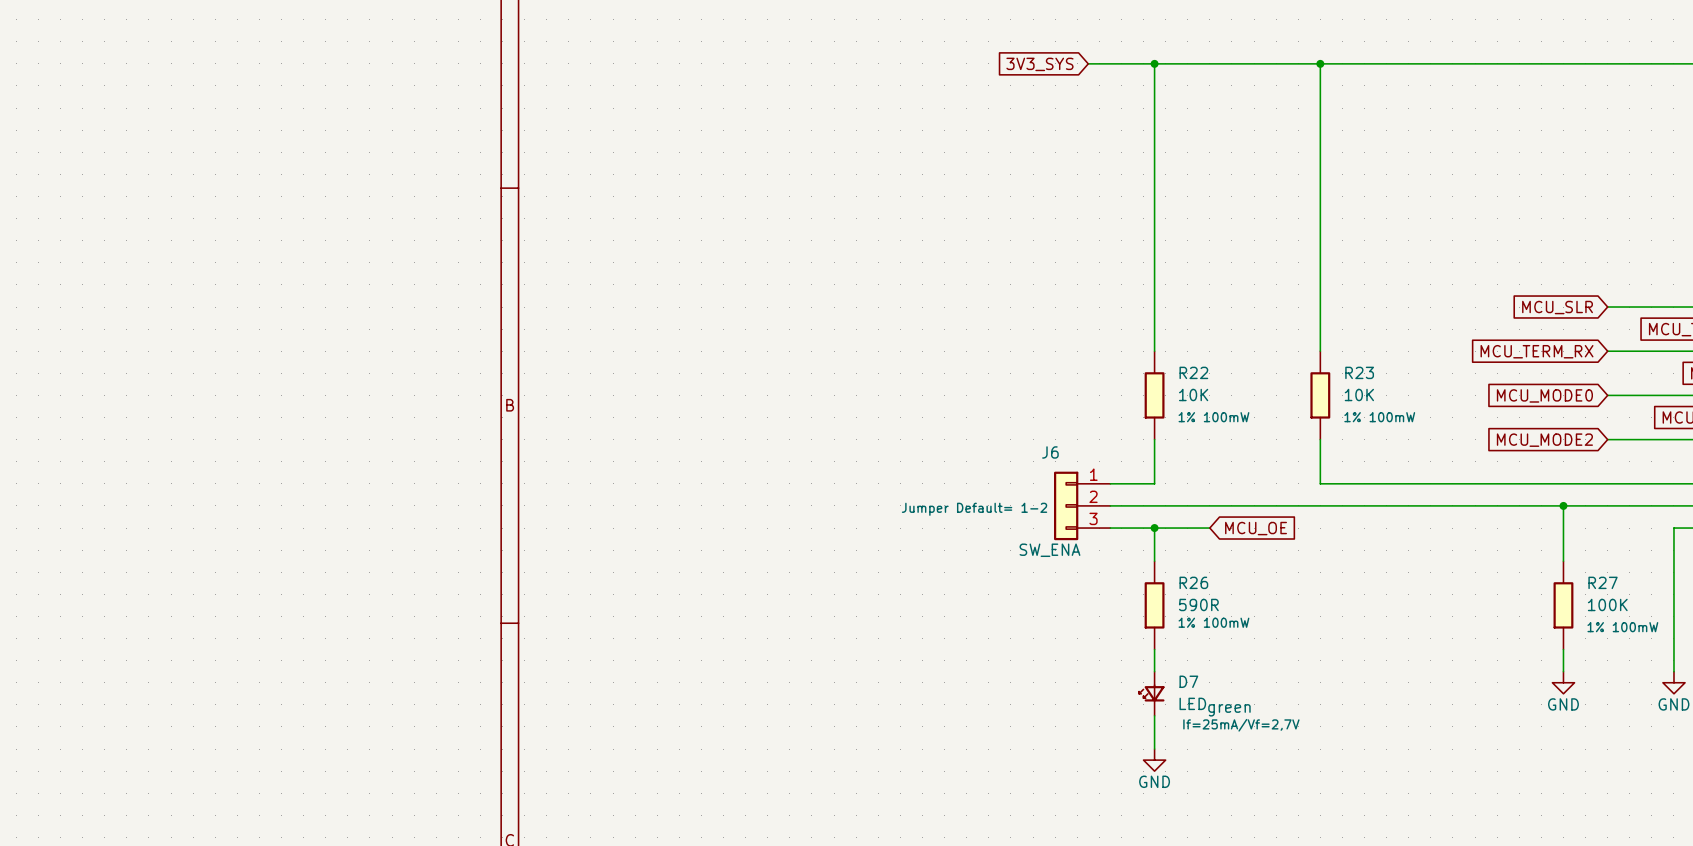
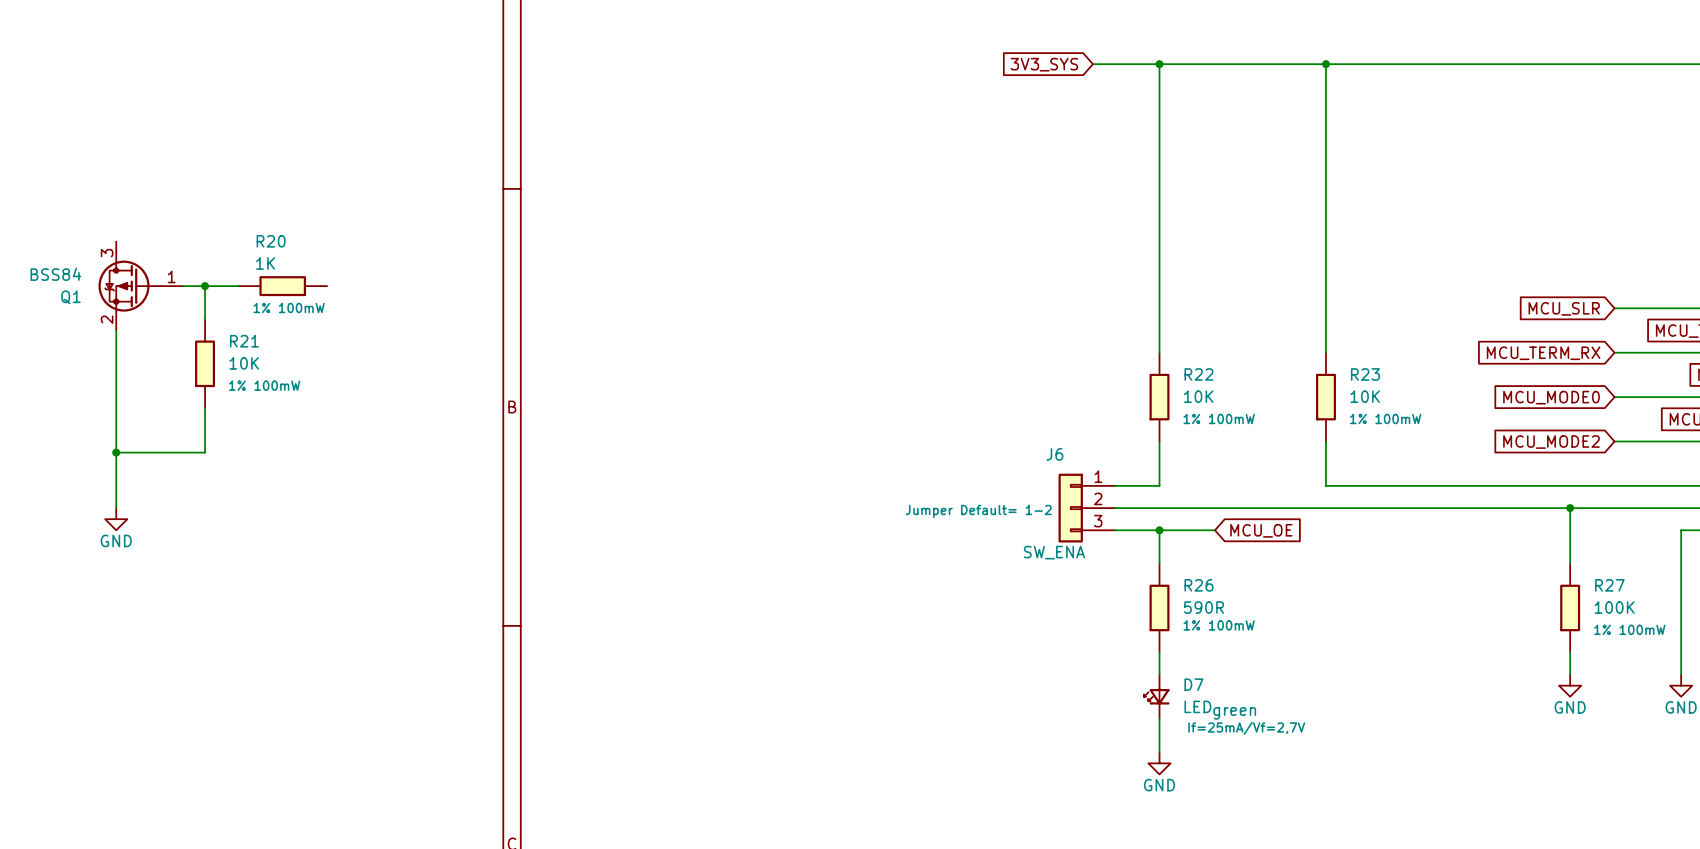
Q1: none -> BSS84 (140, 286)
wire: none -> (182, 286) (238, 286)
wire: none -> (205, 286) (205, 319)
junction: none -> (205, 286)
R20: none -> 1K (282, 286)
wire: none -> (116, 330) (116, 508)
R21: none -> 10K (205, 363)
wire: none -> (205, 408) (205, 452) (116, 452)
junction: none -> (116, 452)
power symbol: none -> GND (116, 519)

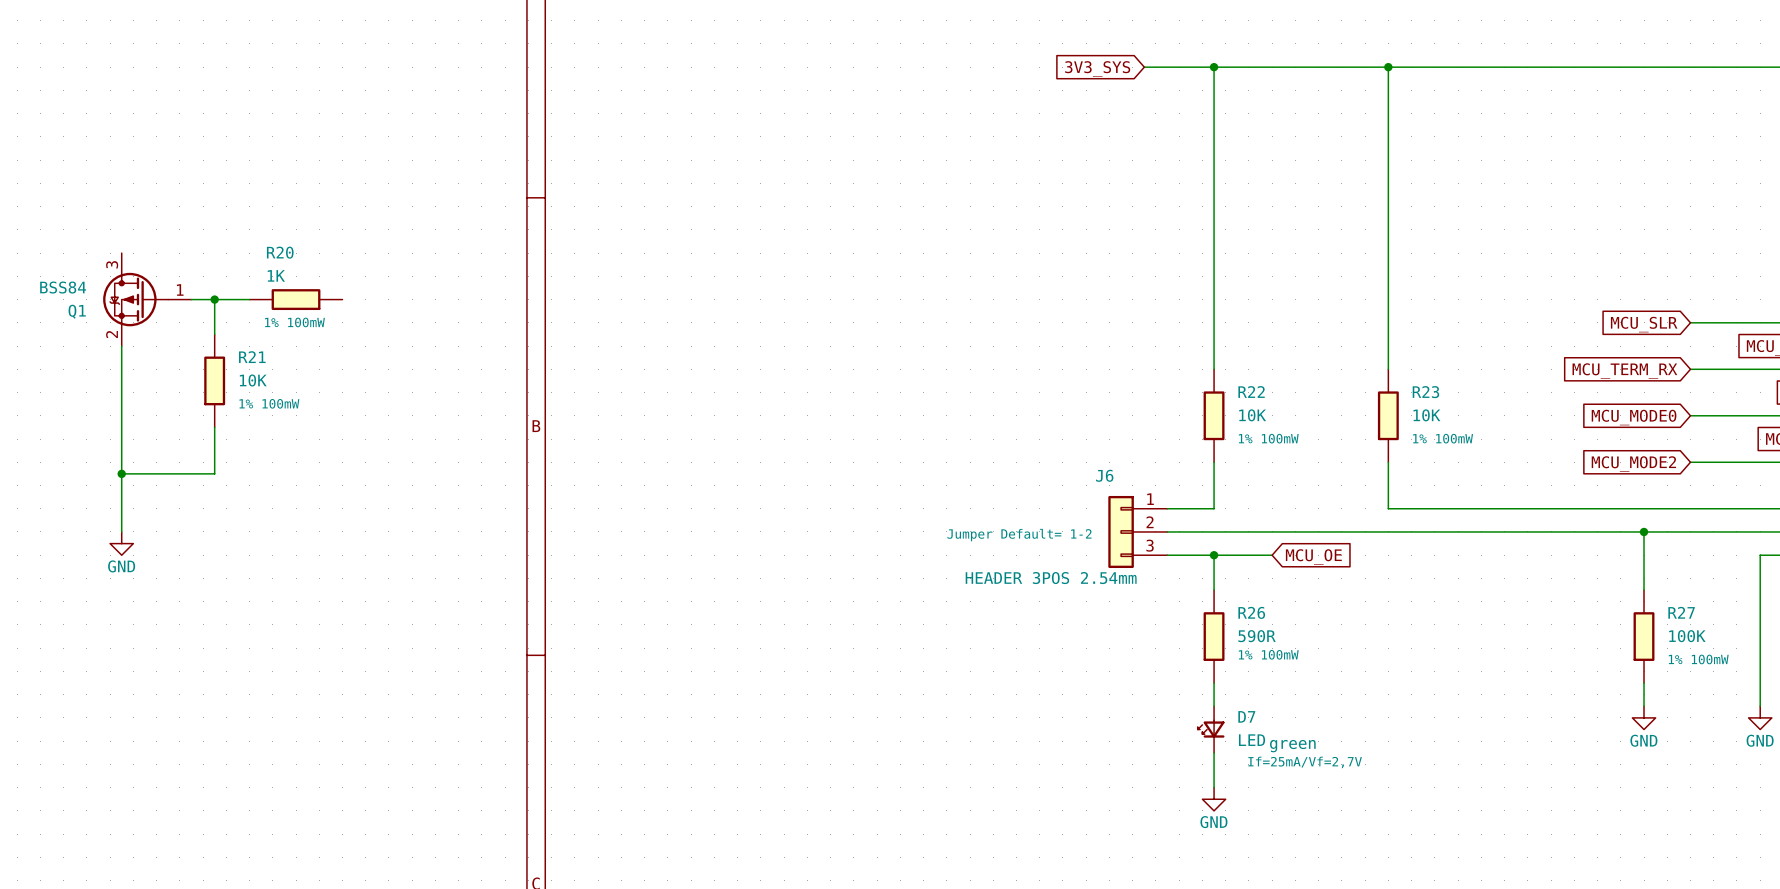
J6 value: SW_ENA (1054, 552) -> HEADER 3POS 2.54mm (1051, 578)

